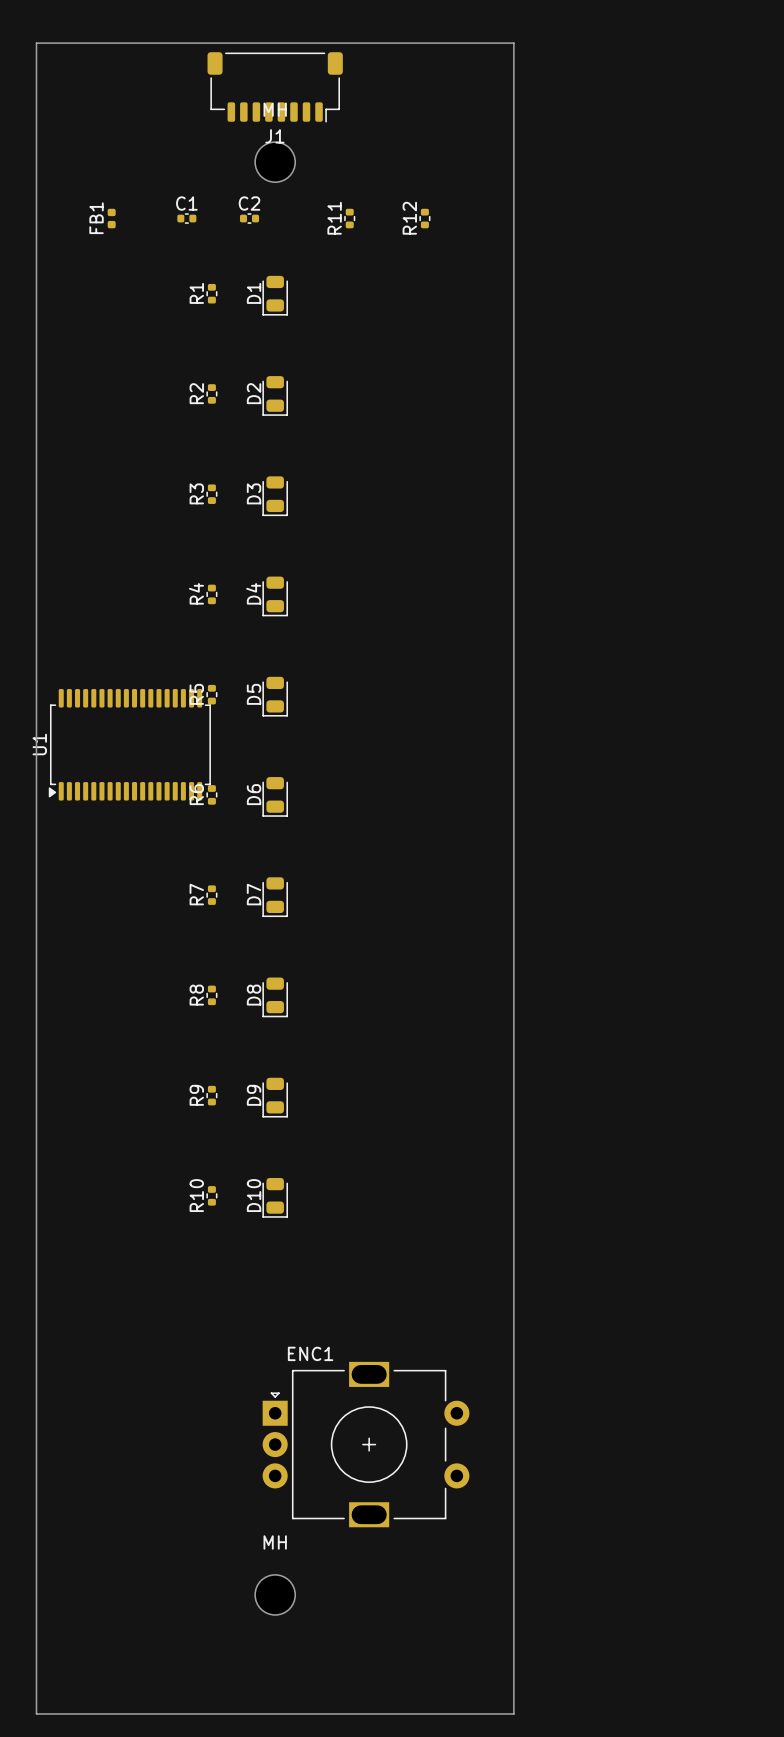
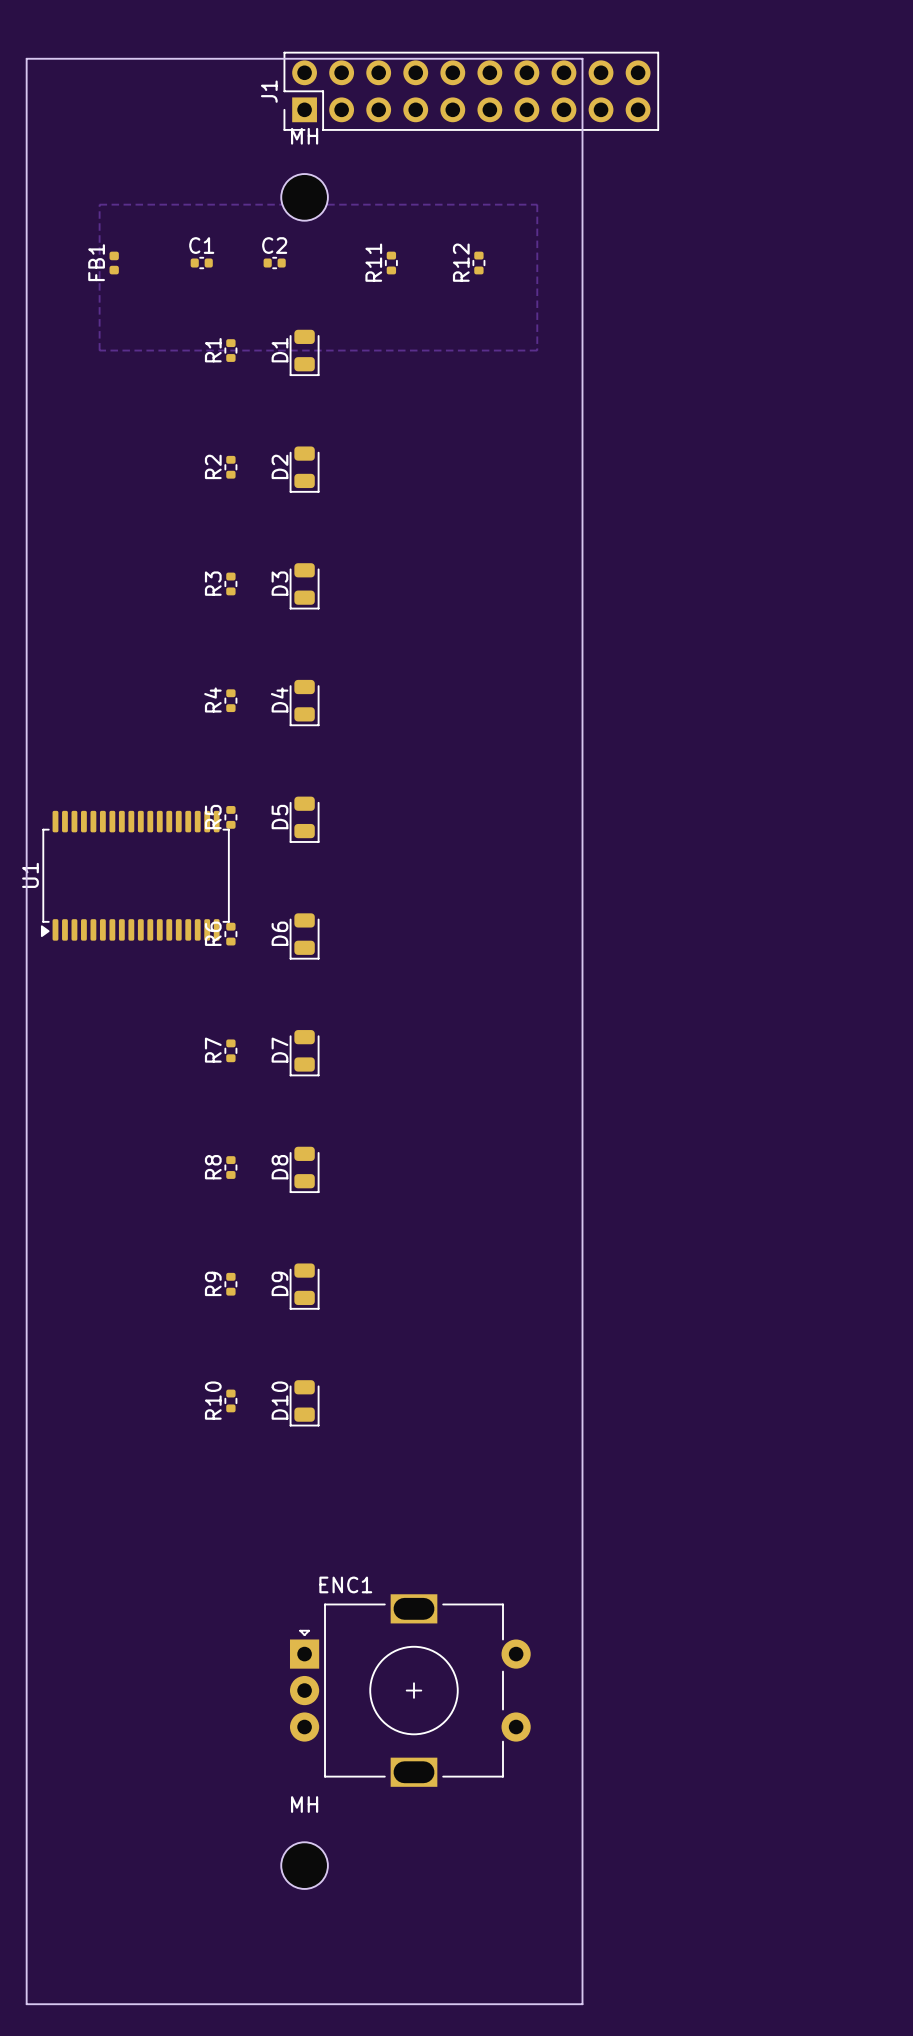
J1 footprint: [207, 52, 343, 123] -> [283, 51, 660, 131]
J1 name position: J1 (274, 136) -> J1 (269, 91)
zone outline: none -> (99, 204) (537, 204) (537, 350) (99, 350) (99, 204)

